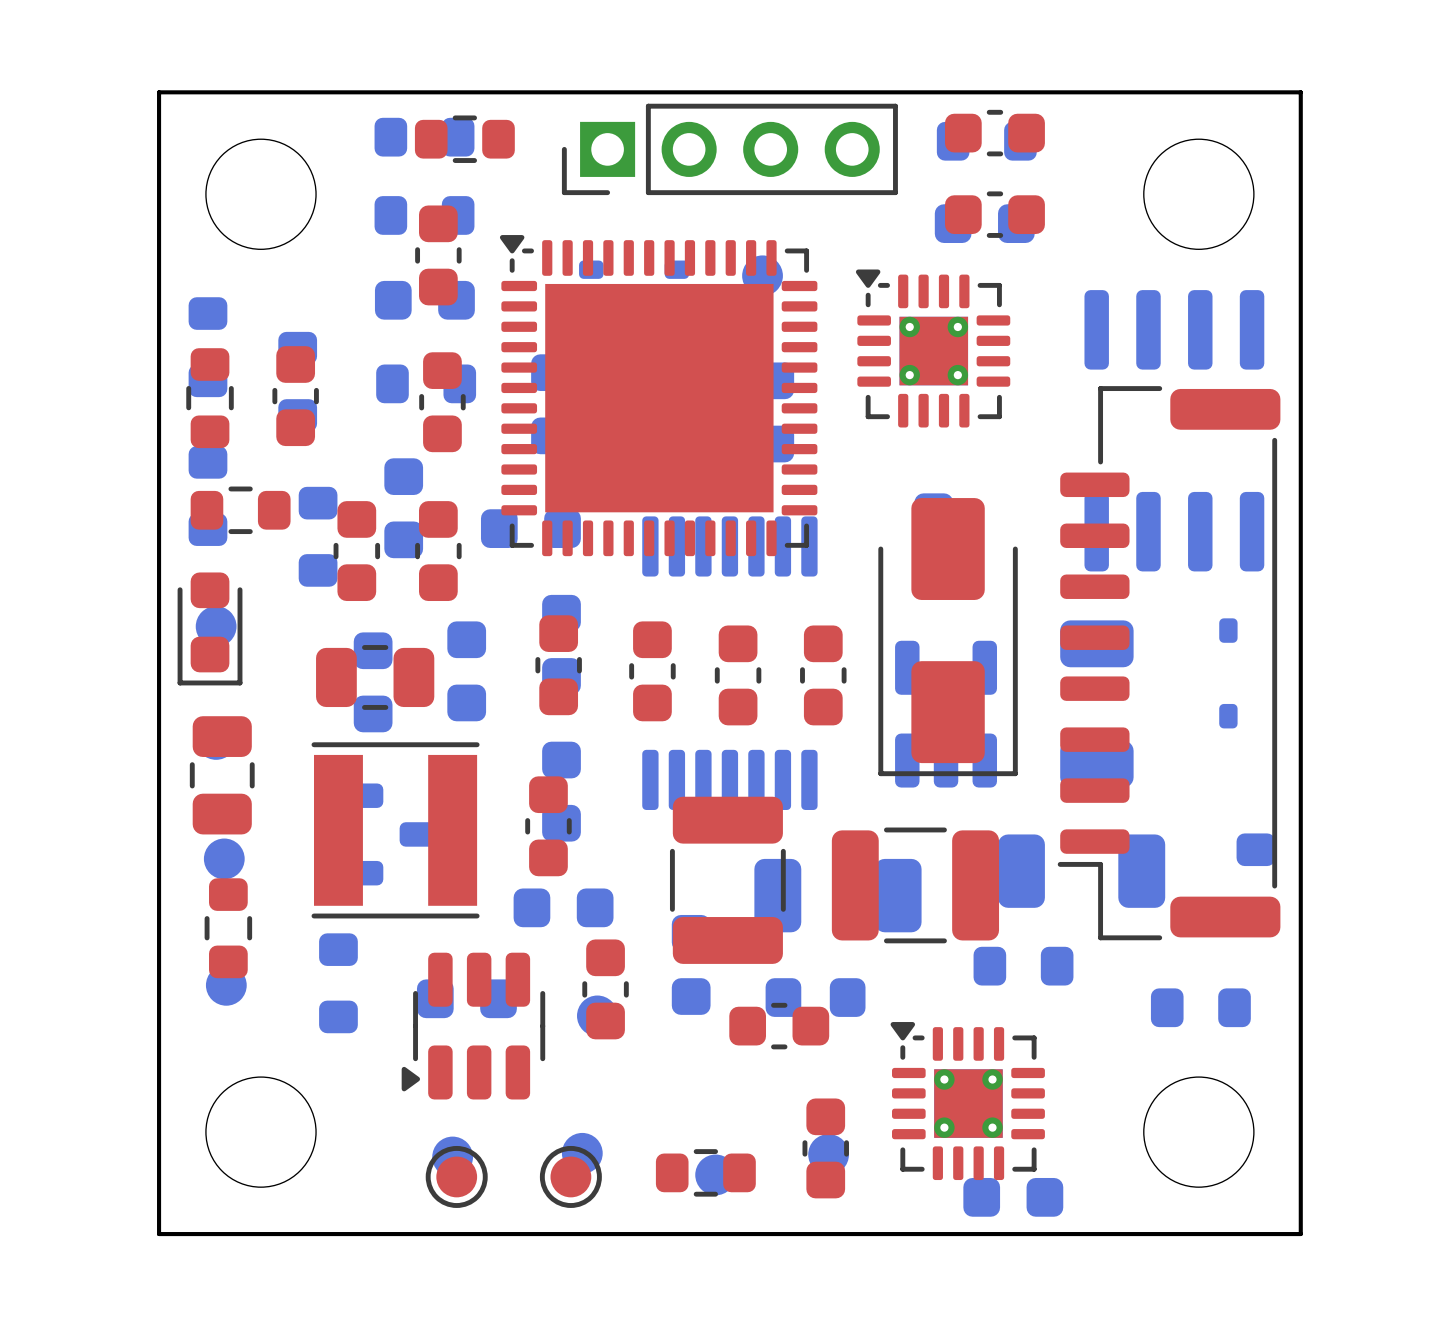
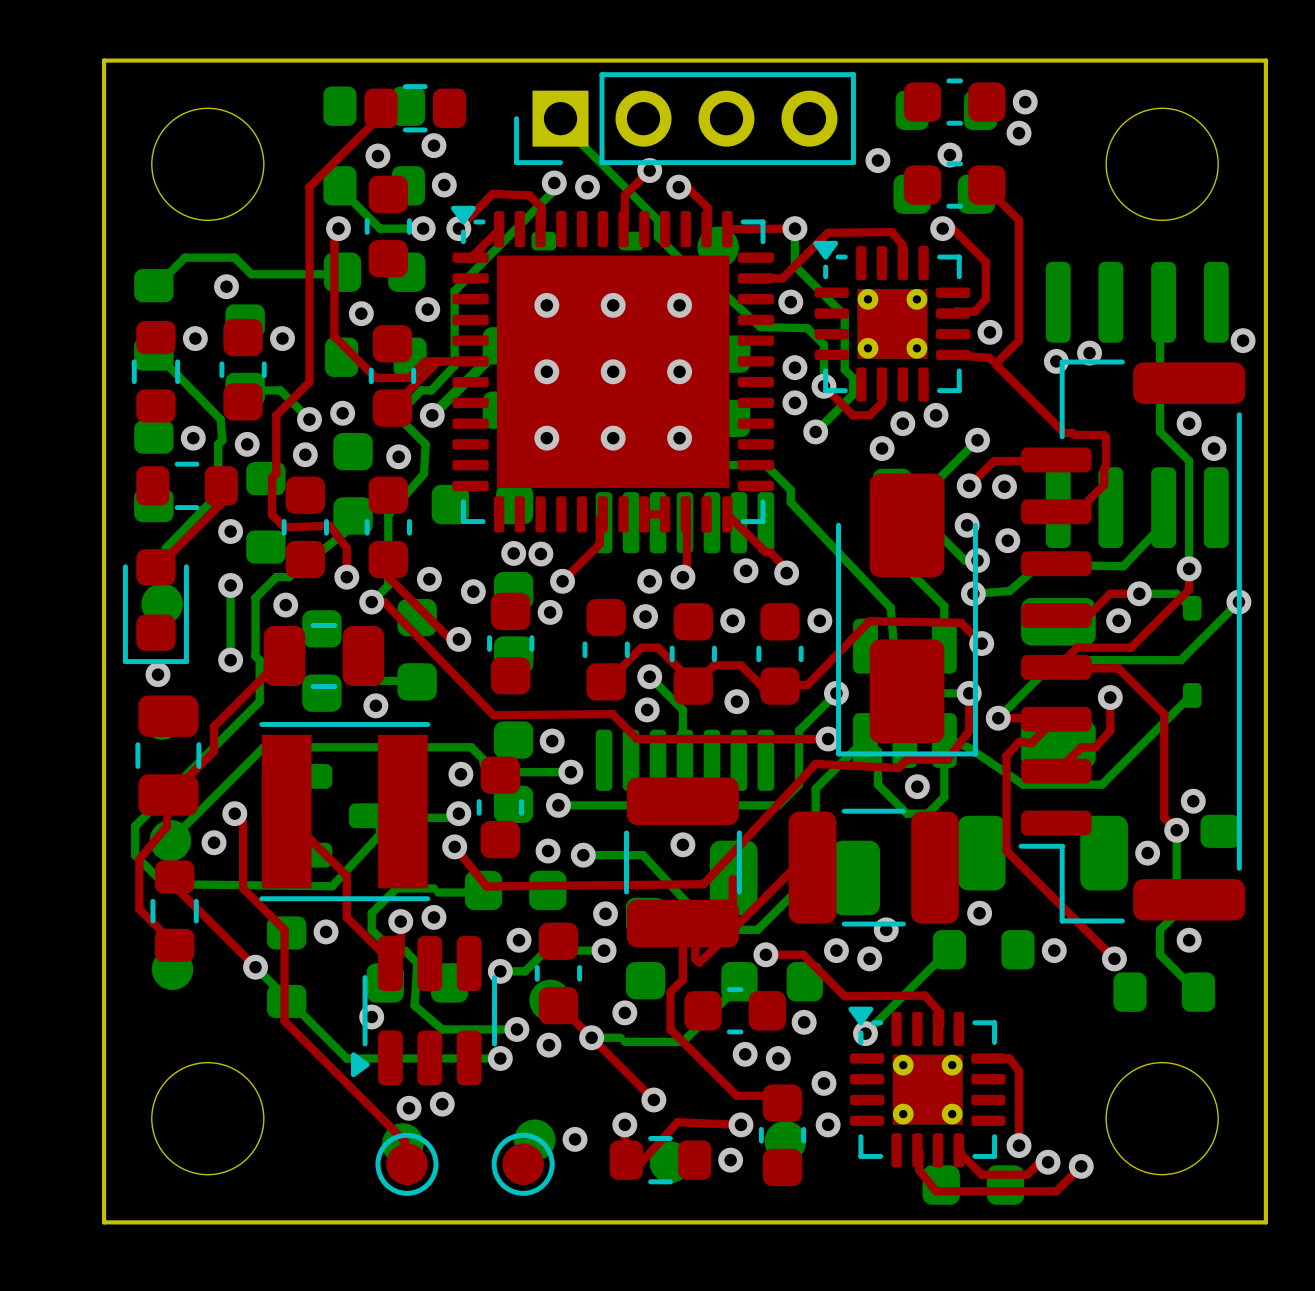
via: none -> (1025, 102)
top track: none -> (381, 108) (380, 116) (309, 187) (309, 382) (276, 415) (276, 473) (272, 477) (272, 514) (284, 527) (329, 525) (346, 548) (346, 577)
bottom track: none -> (560, 118) (562, 124) (658, 220) (658, 236) (703, 282) (711, 282) (760, 327) (807, 328) (823, 344) (823, 386)
via: none -> (1019, 133)
via: none -> (433, 145)
via: none -> (949, 155)
via: none -> (377, 156)
via: none -> (877, 160)
top track: none -> (649, 170) (624, 195) (623, 229)
via: none -> (649, 170)
bottom track: none -> (554, 182) (554, 189) (454, 290) (454, 365) (431, 390) (421, 390) (404, 407) (404, 423) (425, 444) (424, 473) (388, 514) (388, 585) (371, 602)
via: none -> (554, 182)
via: none -> (444, 185)
bottom track: none -> (339, 185) (342, 191) (380, 228) (423, 228)
via: none -> (587, 187)
top track: none -> (678, 187) (687, 187) (707, 207) (706, 229)
via: none -> (678, 187)
top track: none -> (989, 191) (1019, 220) (1019, 340) (998, 361)
via: none -> (338, 228)
via: none -> (423, 228)
top track: none -> (458, 228) (492, 193) (529, 195) (541, 207) (540, 229)
via: none -> (458, 228)
top track: none -> (794, 228) (727, 229)
bottom track: none -> (794, 228) (794, 265) (844, 315) (844, 369) (853, 377) (853, 394) (815, 431)
via: none -> (794, 228)
top track: none -> (942, 228) (952, 228) (985, 261) (985, 299) (975, 311) (956, 311) (953, 313)
via: none -> (942, 228)
top track: none -> (334, 232) (334, 336) (375, 377) (409, 377) (425, 361) (470, 361)
top track: none -> (496, 232) (471, 257)
top track: none -> (902, 263) (902, 245) (891, 232) (828, 232) (782, 278) (755, 278)
bottom track: none -> (342, 272) (338, 274) (251, 274) (234, 257) (184, 257) (160, 282) (153, 285)
via: none -> (226, 286)
via: none -> (790, 302)
bottom track: none -> (1163, 302) (1160, 305) (1160, 431) (1189, 460) (1189, 568)
via: none -> (546, 305)
via: none -> (613, 305)
via: none -> (679, 305)
via: none -> (427, 309)
via: none -> (361, 313)
via: none -> (989, 332)
via: none -> (195, 338)
via: none -> (282, 338)
via: none -> (1243, 340)
bottom track: none -> (502, 345) (432, 415)
via: none -> (1089, 353)
bottom track: none -> (153, 354) (160, 357) (220, 419) (222, 440) (218, 444) (218, 494) (165, 548) (164, 602) (162, 604)
top track: none -> (956, 355) (989, 357) (991, 360)
top track: none -> (438, 361) (396, 402)
via: none -> (1056, 361)
top track: none -> (995, 364) (1064, 433) (1072, 433)
via: none -> (794, 367)
via: none -> (546, 371)
via: none -> (613, 371)
via: none -> (679, 371)
top track: none -> (882, 384) (882, 402) (869, 415) (853, 415) (823, 386)
via: none -> (823, 386)
bottom track: none -> (245, 389) (280, 390) (309, 419)
via: none -> (794, 402)
bottom track: none -> (645, 407) (645, 440) (670, 465) (765, 465) (790, 490) (790, 502) (890, 607) (894, 651) (933, 693) (969, 693)
via: none -> (342, 413)
via: none -> (432, 415)
via: none -> (936, 415)
via: none -> (309, 419)
via: none -> (902, 423)
via: none -> (1189, 423)
via: none -> (815, 431)
top track: none -> (1074, 435) (1104, 435)
top track: none -> (1106, 437) (1106, 466)
via: none -> (193, 438)
via: none -> (546, 438)
via: none -> (613, 438)
via: none -> (679, 438)
bottom track: none -> (977, 440) (940, 477) (940, 535) (965, 560) (977, 560)
via: none -> (977, 440)
via: none -> (247, 444)
via: none -> (882, 448)
via: none -> (1214, 448)
via: none -> (305, 454)
via: none -> (398, 456)
top track: none -> (1056, 459) (994, 460) (969, 485)
top track: none -> (1104, 468) (1104, 484) (1077, 511) (1056, 511)
top track: none -> (221, 485) (222, 502) (155, 567)
via: none -> (969, 485)
via: none -> (1004, 486)
bottom track: none -> (1163, 507) (1164, 523) (1123, 566) (1039, 564) (1009, 591) (973, 593)
top track: none -> (602, 514) (599, 519) (599, 543) (562, 581)
top track: none -> (644, 514) (665, 514)
top track: none -> (685, 514) (687, 573) (682, 577)
top track: none -> (727, 514) (765, 552) (770, 552) (786, 568) (786, 573)
bottom track: none -> (353, 515) (356, 523) (288, 577) (276, 577) (255, 597) (255, 656) (259, 660) (259, 701) (135, 826) (135, 855) (164, 884) (332, 886) (380, 834) (380, 816) (454, 817) (458, 813)
via: none -> (967, 525)
via: none -> (230, 531)
via: none -> (1007, 540)
via: none -> (513, 553)
via: none -> (540, 554)
bottom track: none -> (892, 554) (944, 606) (944, 646)
top track: none -> (388, 559) (388, 577) (450, 639)
via: none -> (977, 560)
top track: none -> (1189, 568) (1189, 589) (1131, 647) (1077, 647) (1056, 667) (1118, 668) (1164, 714) (1164, 817) (1176, 830)
via: none -> (1189, 568)
via: none -> (746, 570)
via: none -> (786, 573)
via: none -> (346, 577)
via: none -> (682, 577)
via: none -> (429, 579)
via: none -> (562, 581)
via: none -> (649, 581)
bottom track: none -> (230, 585) (230, 660)
via: none -> (230, 585)
via: none -> (473, 591)
via: none -> (973, 593)
top track: none -> (1139, 593) (1110, 593) (1089, 614) (1056, 615)
bottom track: none -> (1139, 593) (1176, 593) (1192, 608)
via: none -> (1139, 593)
top track: none -> (371, 602) (384, 602) (493, 715) (612, 714) (637, 738) (828, 738)
via: none -> (371, 602)
bottom track: none -> (1238, 602) (1180, 660) (1056, 660) (998, 718)
via: none -> (1238, 602)
via: none -> (285, 605)
via: none -> (550, 612)
via: none -> (645, 616)
via: none -> (732, 620)
via: none -> (819, 620)
via: none -> (1118, 620)
via: none -> (458, 639)
top track: none -> (981, 643) (960, 622) (869, 621) (807, 685) (761, 686) (741, 665) (713, 665) (693, 686) (693, 682) (658, 647) (641, 647) (606, 681)
via: none -> (981, 643)
top track: none -> (284, 656) (214, 726) (214, 751) (168, 795) (166, 826) (139, 859) (139, 909) (174, 945)
via: none -> (230, 660)
via: none -> (158, 674)
bottom track: none -> (649, 676) (682, 709) (682, 758) (684, 760)
via: none -> (649, 676)
bottom track: none -> (380, 680) (413, 680)
bottom track: none -> (836, 693) (799, 730) (799, 784) (778, 805) (558, 805)
via: none -> (836, 693)
top track: none -> (969, 693) (969, 730) (947, 759) (906, 759) (898, 768) (815, 763) (703, 884) (486, 886) (454, 846)
via: none -> (969, 693)
bottom track: none -> (1192, 695) (1102, 784) (1023, 784) (968, 747) (948, 738) (944, 740) (944, 797) (927, 813) (906, 813) (877, 784) (877, 751) (865, 740) (815, 788) (815, 871) (757, 929) (711, 929) (643, 855) (583, 855)
top track: none -> (1110, 697) (1110, 730) (1095, 747) (1081, 747) (1056, 771)
via: none -> (1110, 697)
via: none -> (736, 701)
via: none -> (375, 705)
via: none -> (647, 709)
top track: none -> (998, 718) (1056, 719) (1031, 743) (1019, 741) (1006, 755) (1006, 851) (1114, 958)
via: none -> (998, 718)
via: none -> (828, 738)
via: none -> (552, 741)
bottom track: none -> (570, 772) (492, 772) (483, 763) (483, 759) (471, 747) (263, 747) (170, 840)
via: none -> (570, 772)
via: none -> (460, 774)
via: none -> (917, 786)
via: none -> (1193, 801)
via: none -> (558, 805)
top track: none -> (286, 811) (286, 815) (346, 875) (346, 917) (388, 958) (390, 963) (400, 954) (400, 921)
top track: none -> (234, 813) (243, 821) (243, 888) (284, 929) (284, 1021) (404, 1141) (404, 1162) (406, 1164)
via: none -> (234, 813)
via: none -> (458, 813)
bottom track: none -> (1176, 830) (1176, 913) (1160, 929) (1160, 954) (1198, 992)
via: none -> (1176, 830)
via: none -> (214, 842)
via: none -> (682, 844)
via: none -> (454, 846)
via: none -> (548, 851)
via: none -> (1147, 853)
via: none -> (583, 855)
top track: none -> (811, 867) (794, 867) (703, 958)
top track: none -> (174, 876) (176, 879) (176, 888) (255, 967)
top track: none -> (732, 879) (732, 900) (695, 938) (695, 958) (699, 963)
bottom track: none -> (433, 888) (396, 888) (371, 913) (371, 929) (392, 950) (404, 950) (417, 963) (414, 1005) (442, 1029) (516, 1029)
bottom track: none -> (438, 892) (479, 892)
via: none -> (605, 913)
via: none -> (979, 913)
via: none -> (433, 917)
via: none -> (400, 921)
top track: none -> (682, 923) (682, 979) (670, 992) (670, 1029) (736, 1095) (774, 1095)
via: none -> (886, 929)
via: none -> (326, 931)
via: none -> (519, 940)
via: none -> (1189, 940)
bottom track: none -> (604, 950) (545, 950) (525, 971) (500, 971)
via: none -> (604, 950)
via: none -> (836, 950)
bottom track: none -> (949, 949) (865, 1033)
via: none -> (1054, 950)
top track: none -> (765, 954) (803, 954) (844, 996) (925, 995) (940, 1012) (940, 1026)
via: none -> (765, 954)
via: none -> (869, 958)
via: none -> (1114, 958)
bottom track: none -> (255, 967) (286, 998) (289, 1004) (292, 1004) (346, 1058) (500, 1058)
via: none -> (255, 967)
via: none -> (500, 971)
bottom track: none -> (736, 987) (682, 1041) (624, 1041)
top track: none -> (559, 1005) (653, 1099)
via: none -> (624, 1012)
via: none -> (371, 1017)
via: none -> (804, 1022)
via: none -> (516, 1029)
via: none -> (865, 1033)
bottom track: none -> (591, 1037) (620, 1037)
via: none -> (591, 1037)
via: none -> (548, 1045)
via: none -> (745, 1054)
via: none -> (500, 1058)
via: none -> (778, 1058)
top track: none -> (988, 1058) (1009, 1058) (1019, 1070) (1019, 1145)
via: none -> (823, 1083)
via: none -> (653, 1099)
via: none -> (442, 1104)
via: none -> (409, 1108)
top track: none -> (624, 1124) (624, 1158) (628, 1162) (641, 1162) (677, 1122) (741, 1124)
via: none -> (624, 1124)
via: none -> (741, 1124)
via: none -> (828, 1124)
via: none -> (575, 1139)
via: none -> (1019, 1145)
top track: none -> (917, 1150) (919, 1152) (919, 1170) (936, 1191) (1056, 1191) (1081, 1166)
top track: none -> (958, 1150) (981, 1174) (1027, 1174) (1039, 1162) (1048, 1162)
via: none -> (730, 1160)
via: none -> (1048, 1162)
via: none -> (1081, 1166)

